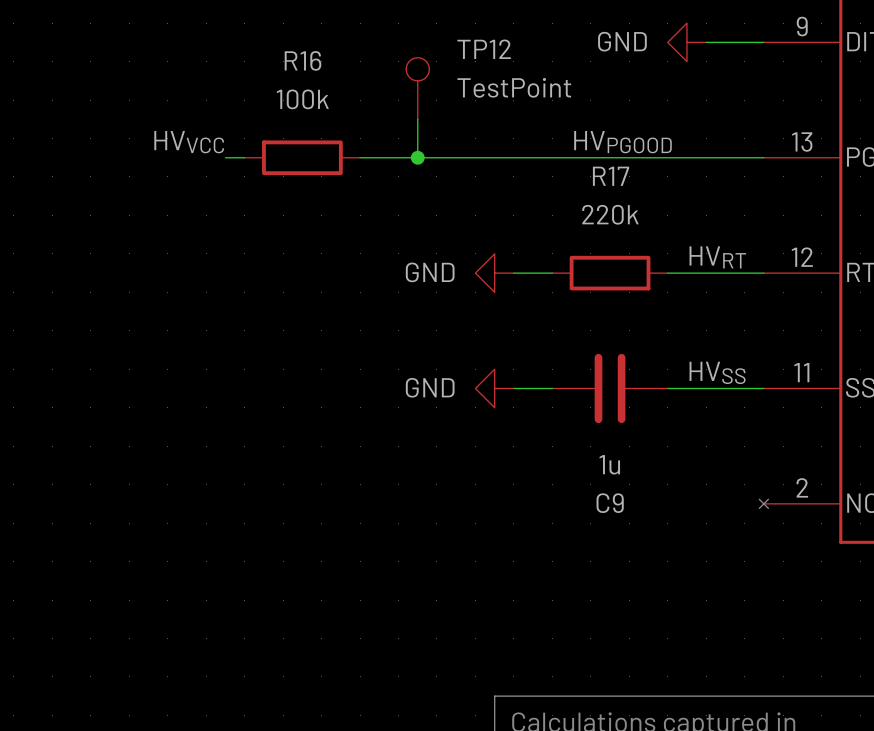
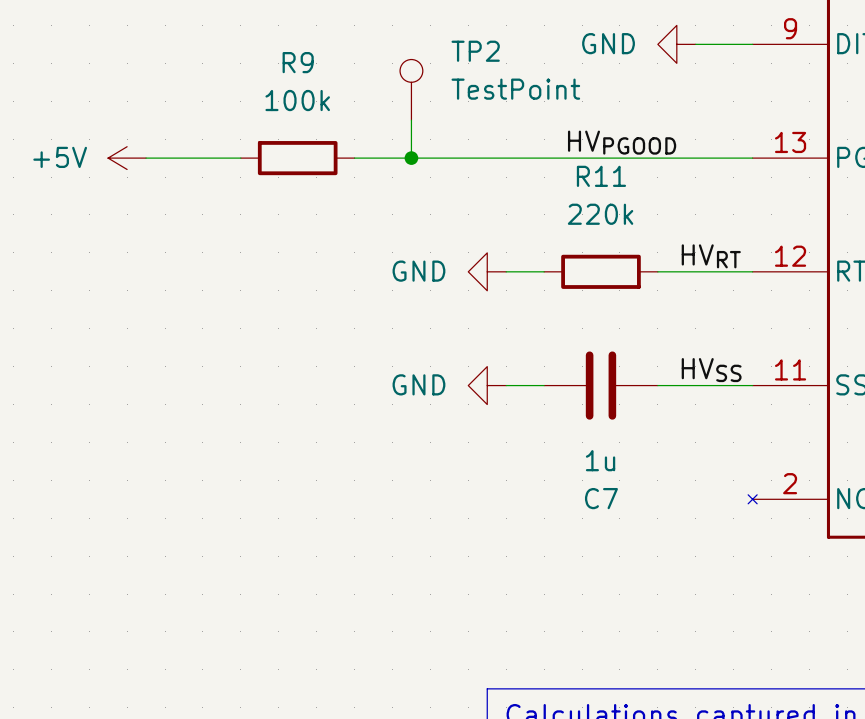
TP12 name: TP12 (484, 49) -> TP2 (475, 51)
R16 name: R16 (303, 60) -> R9 (298, 62)
label: HVVCC (189, 142) -> none
power symbol: none -> +5V (127, 158)
wire: none -> (146, 158) (221, 158)
R17 name: R17 (611, 176) -> R11 (601, 176)
C9 name: C9 (610, 503) -> C7 (601, 498)

